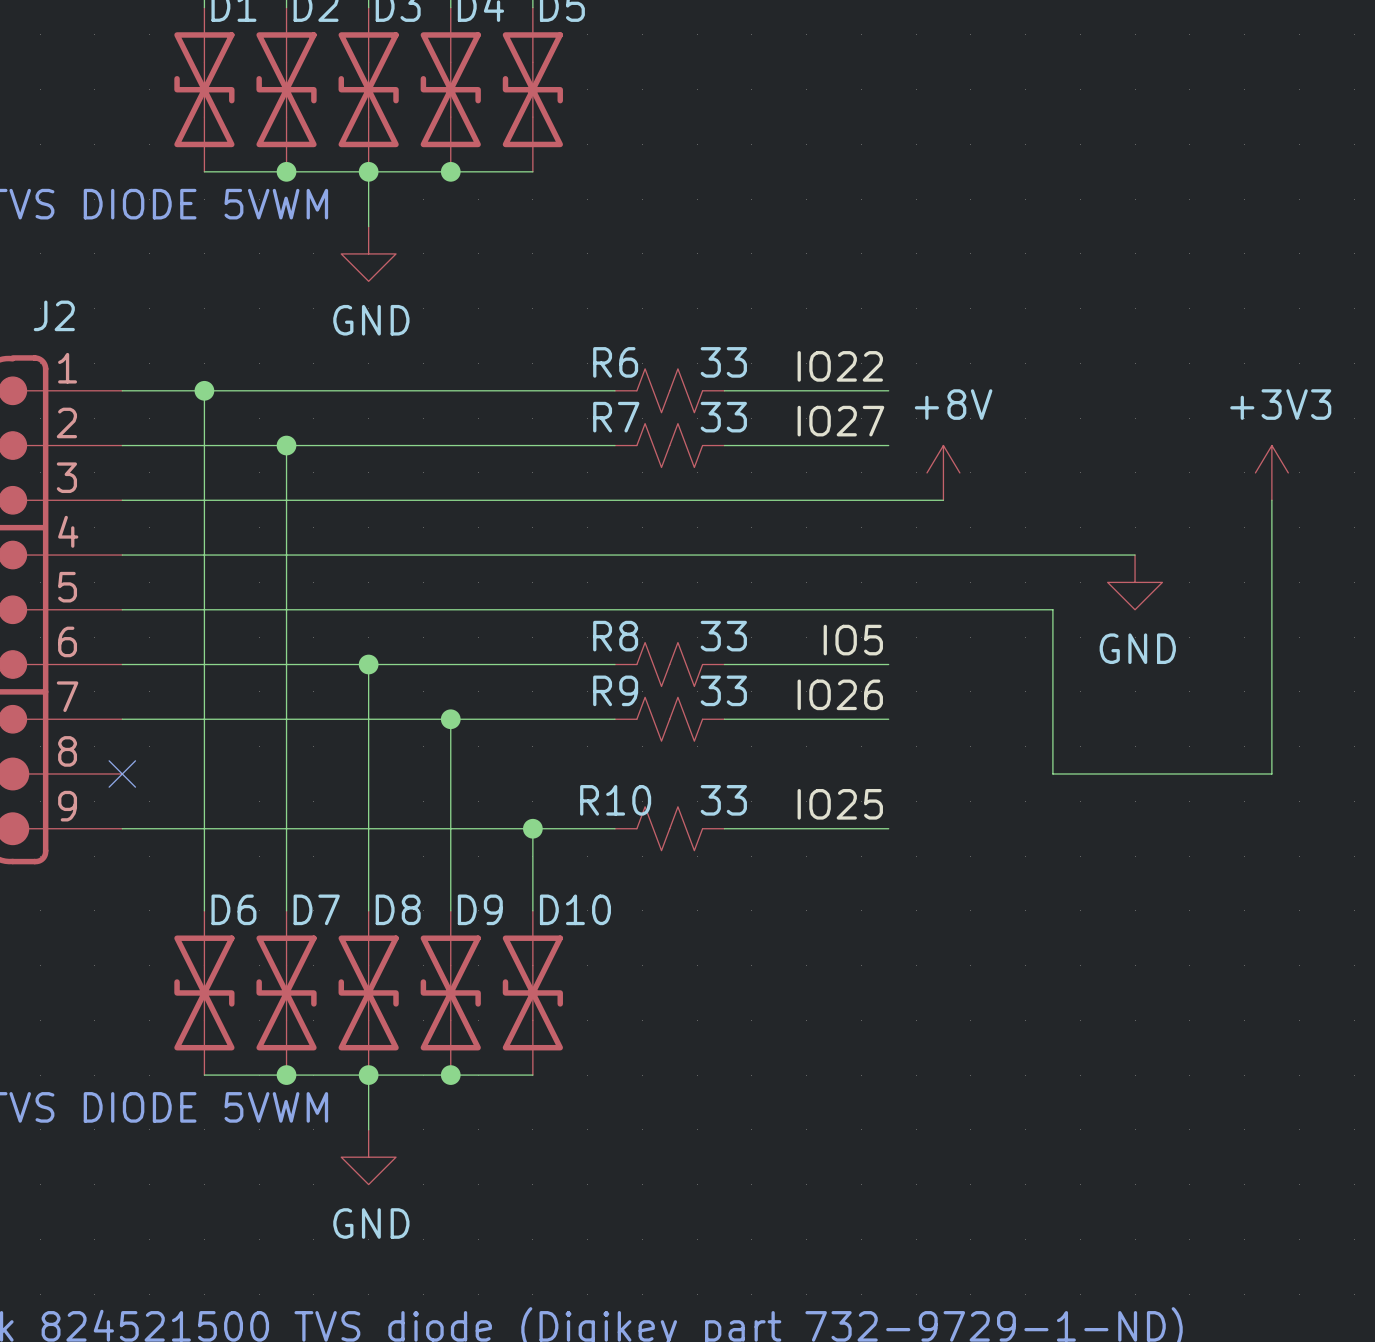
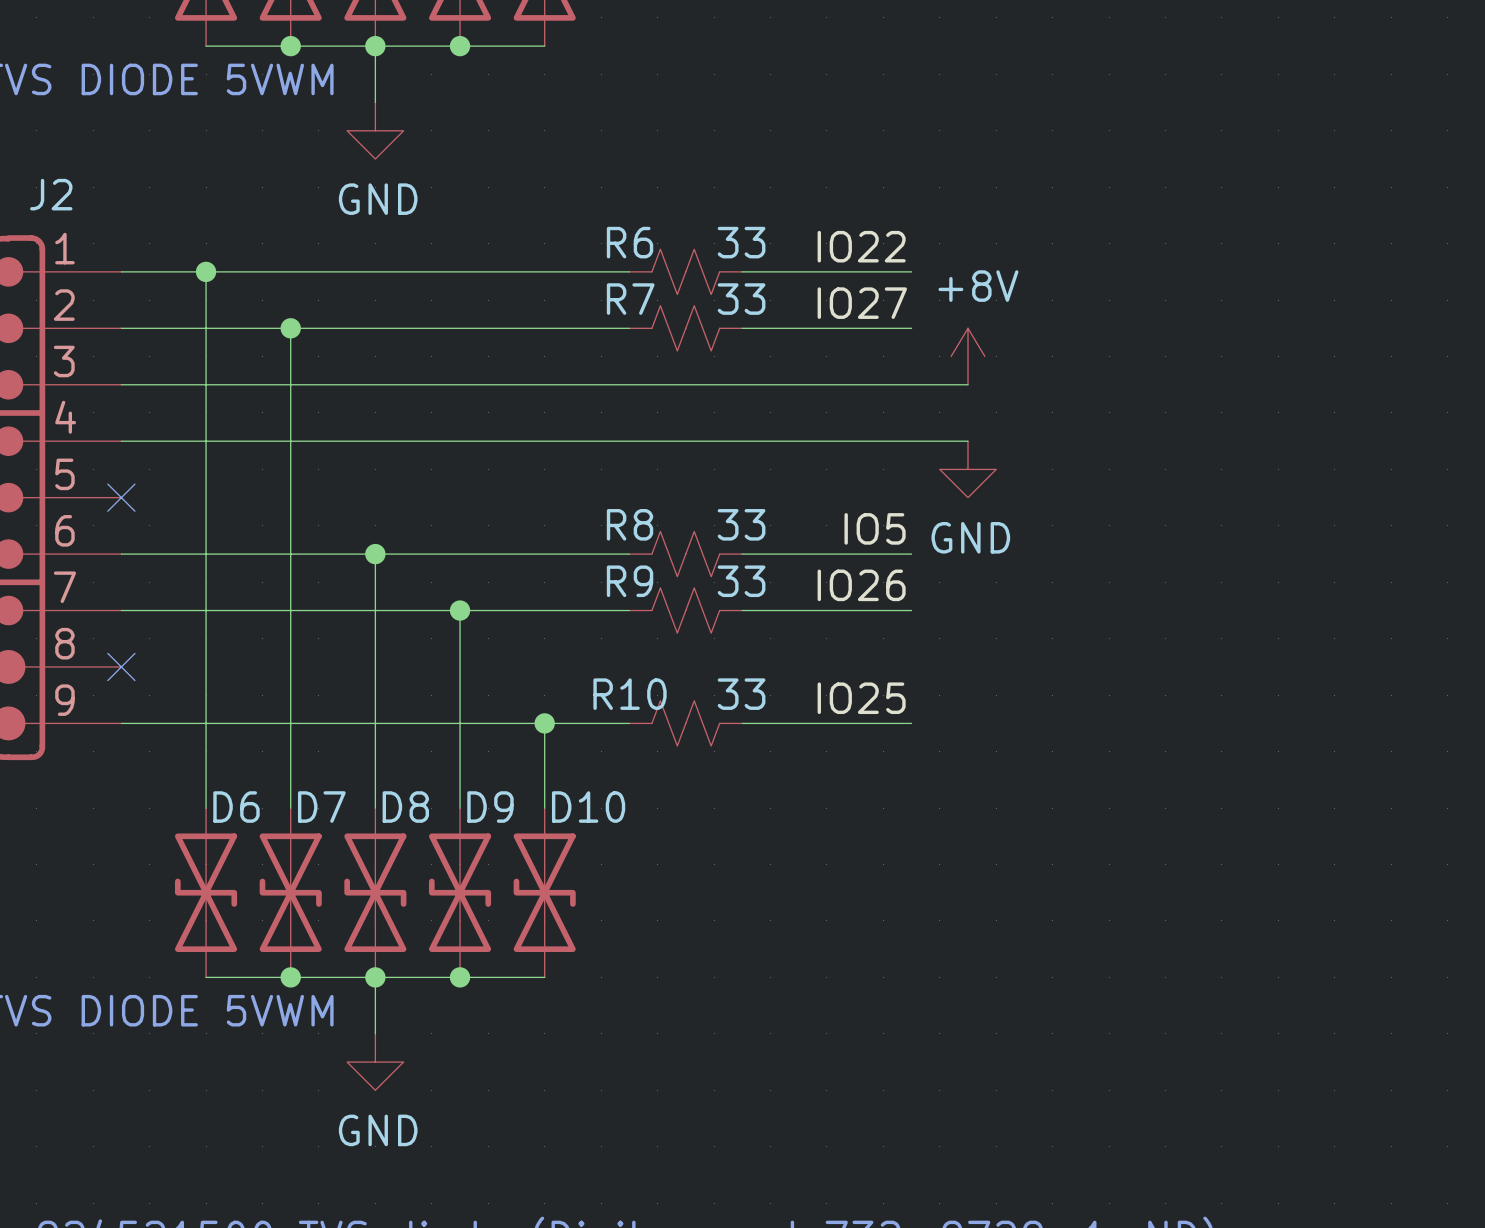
power symbol: +3V3 (1271, 472) -> none
wire: (1271, 500) (1271, 773) (1052, 773) (1052, 609) (122, 609) -> none
wire: (943, 555) (1135, 555) -> none
power symbol position: GND (1135, 582) -> GND (968, 469)
no-connect mark: none -> (121, 497)

